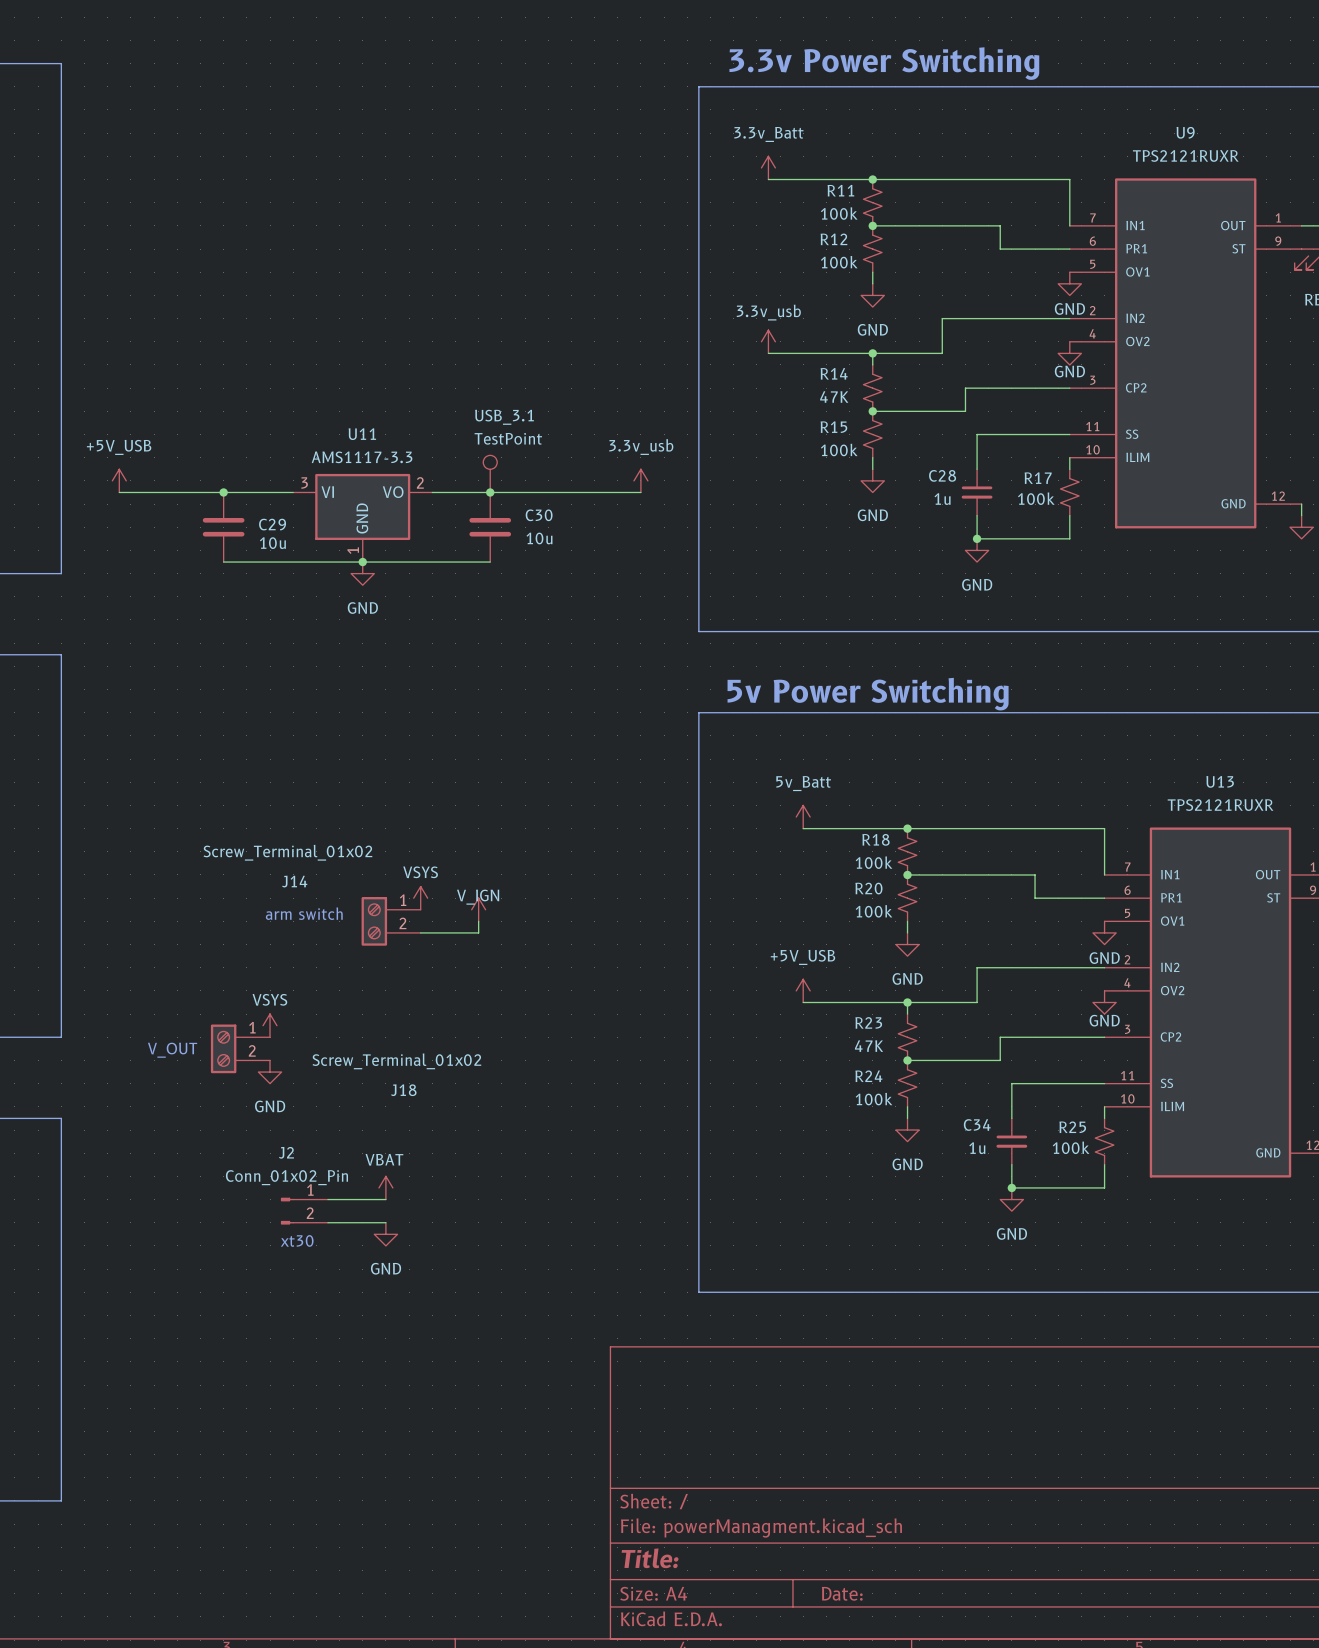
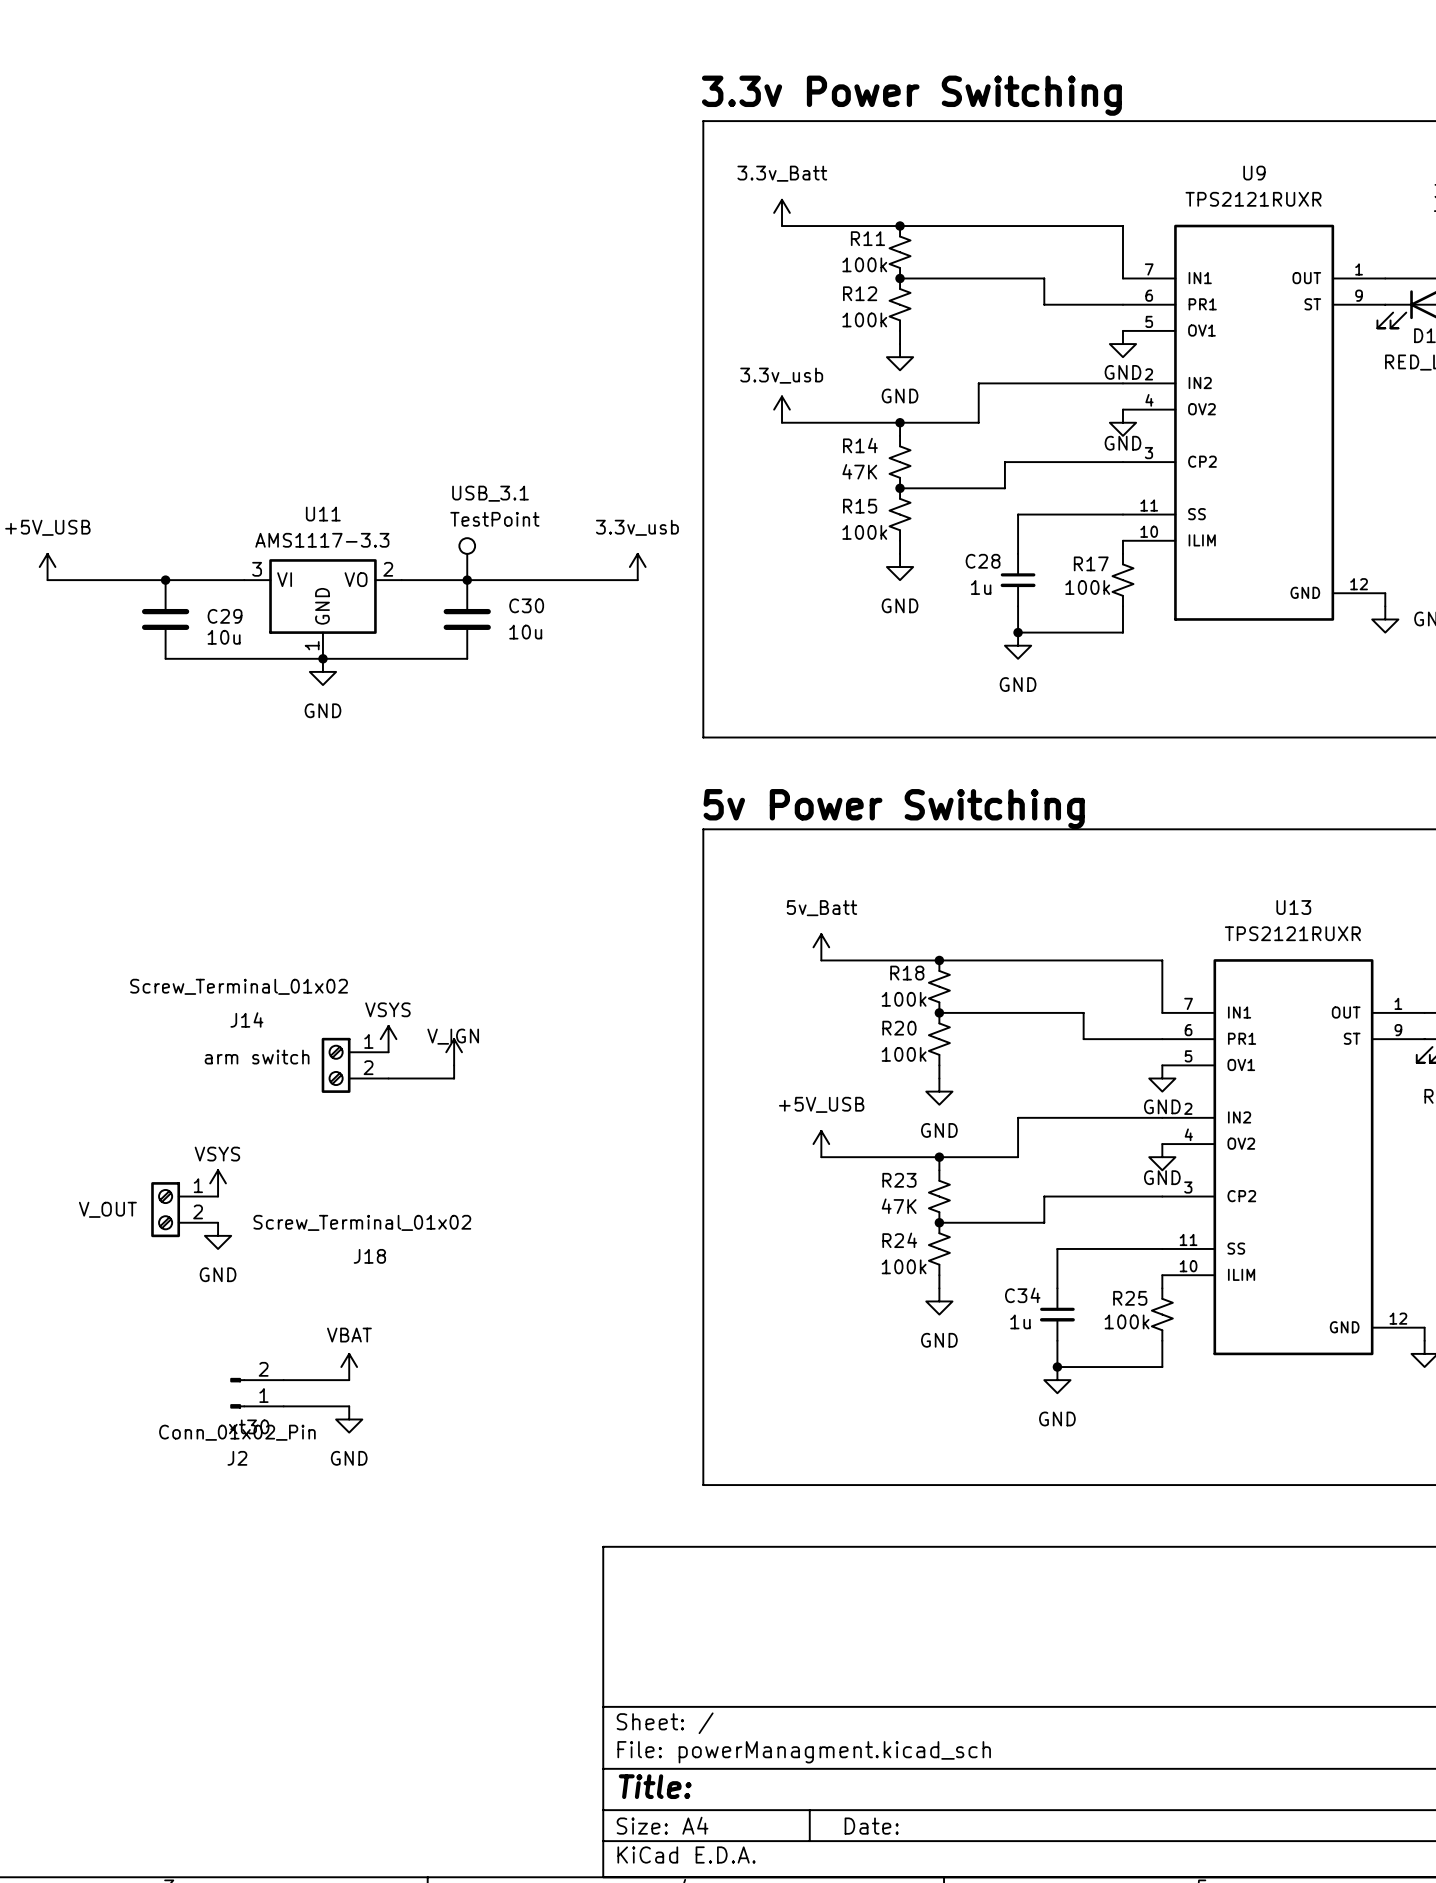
J2 flip: as is (287, 1211) -> up-down (237, 1393)

